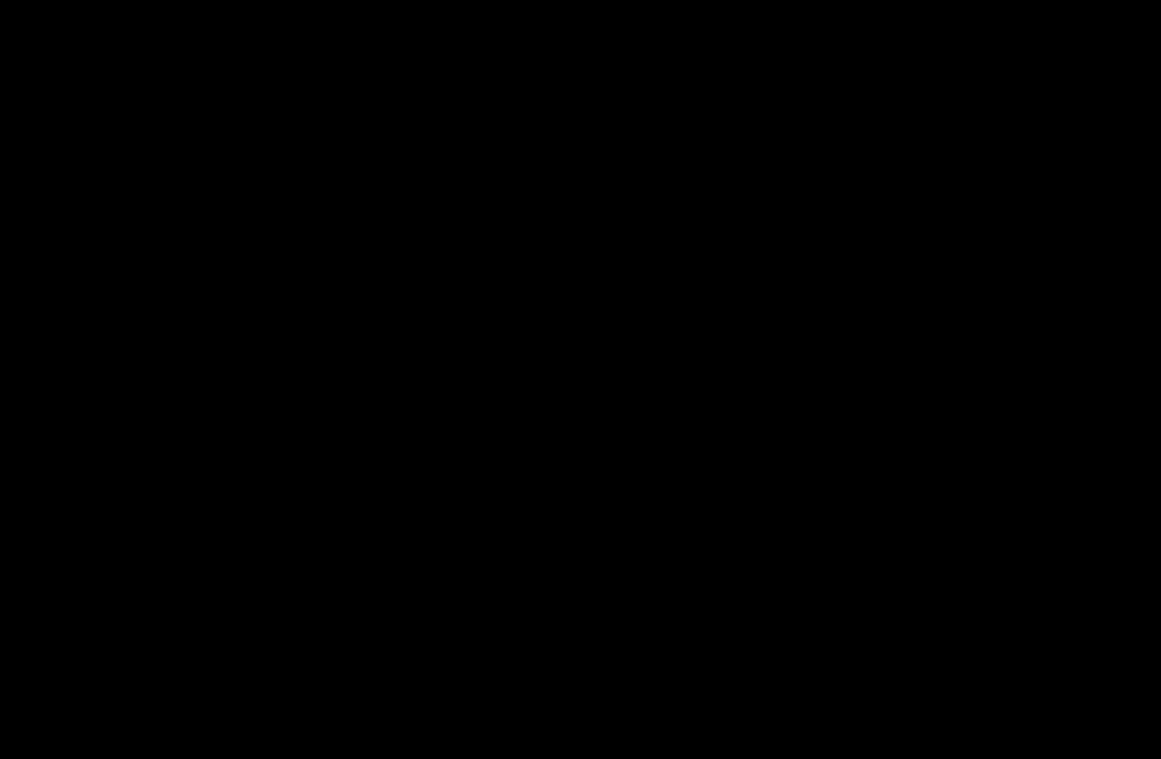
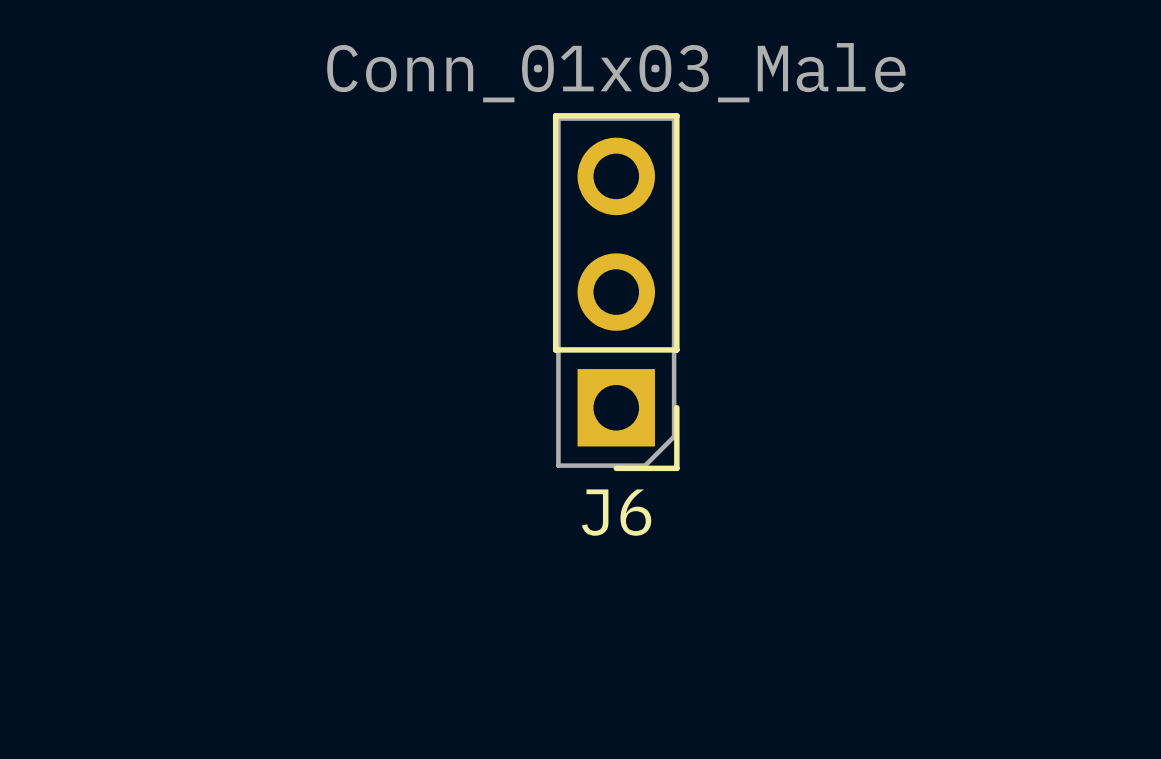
J6: none -> Conn_01x03_Male (616, 292)

